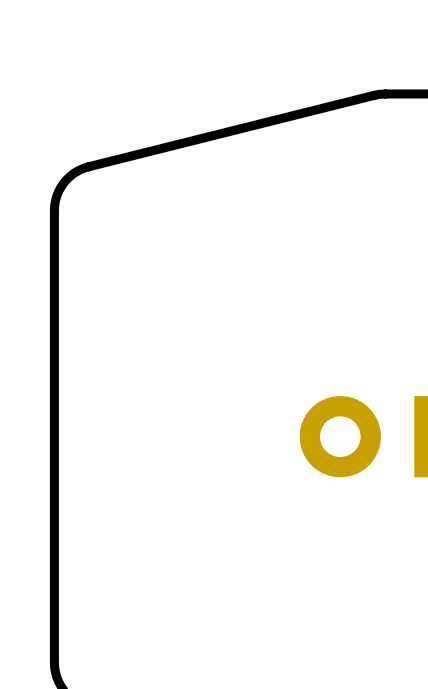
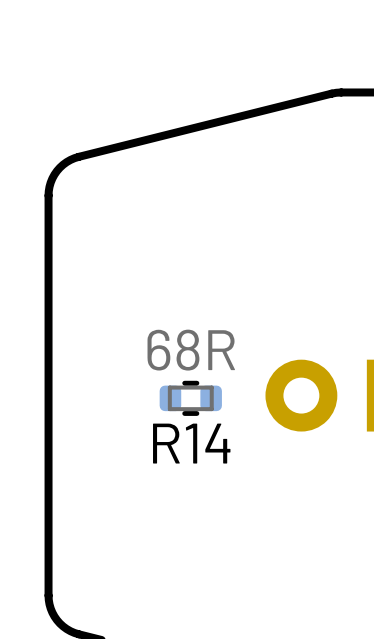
R14: none -> 68R (190, 398)

